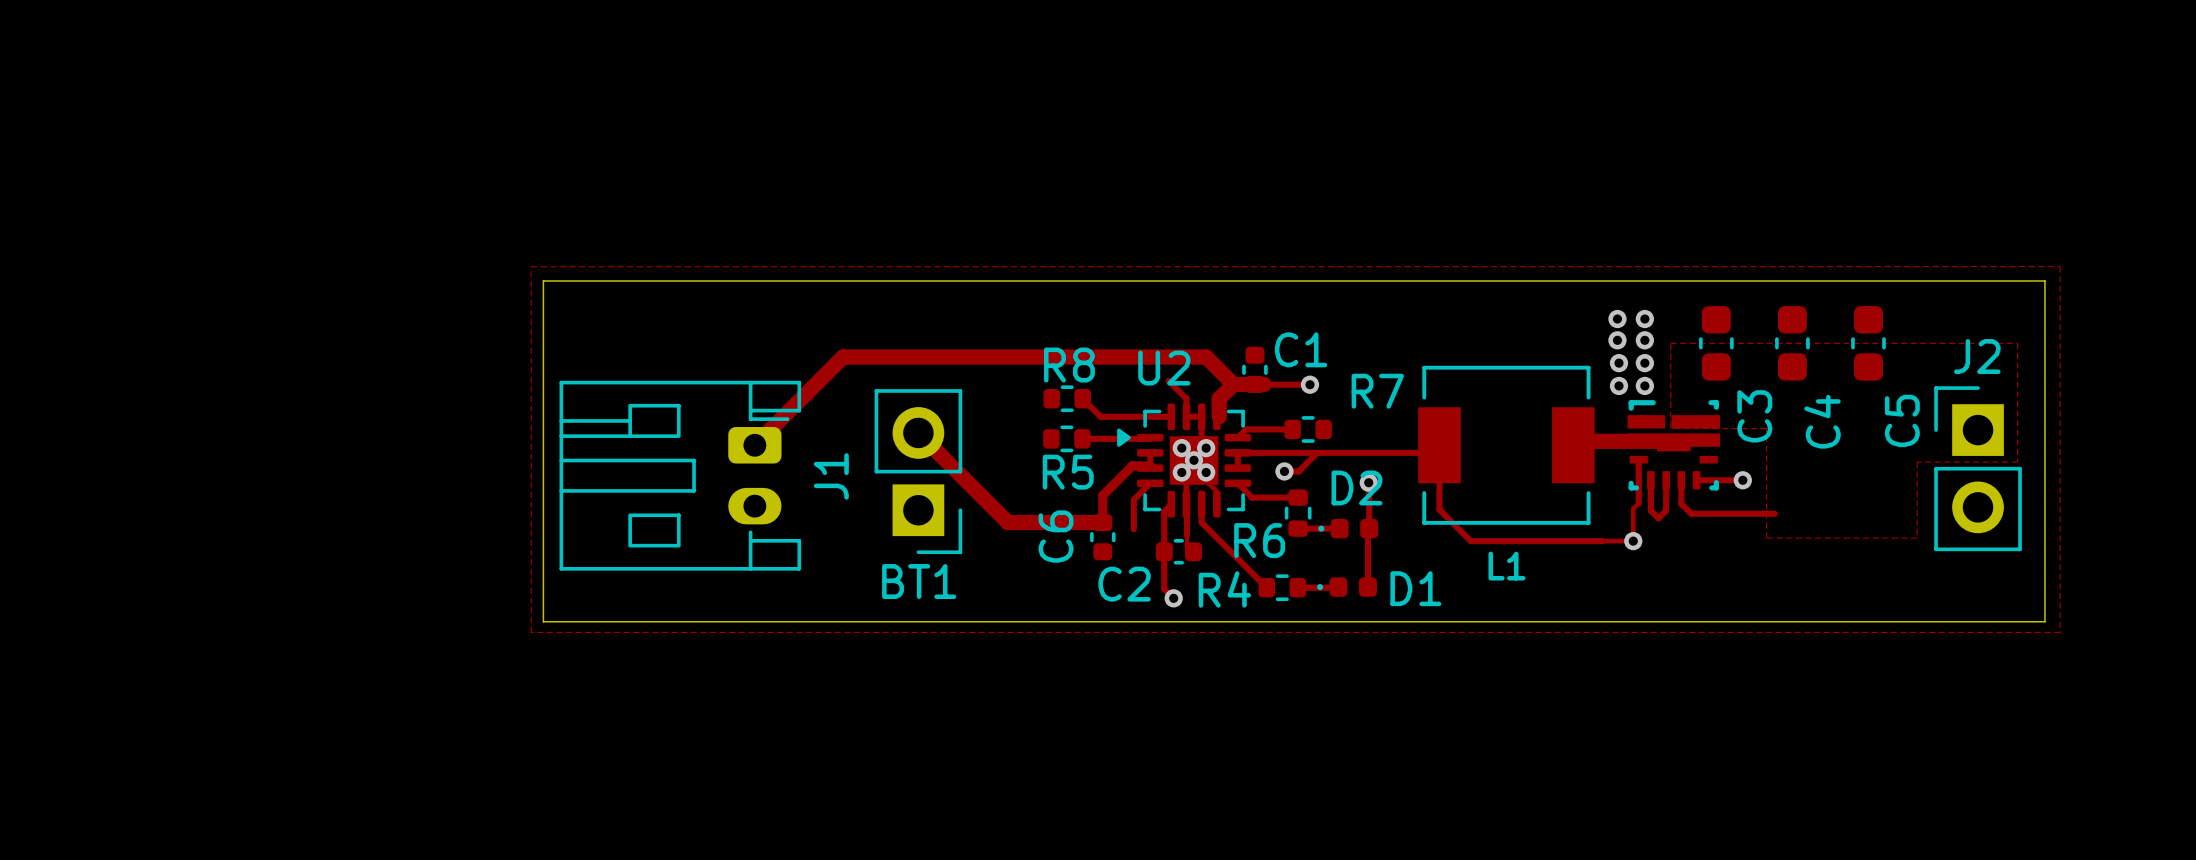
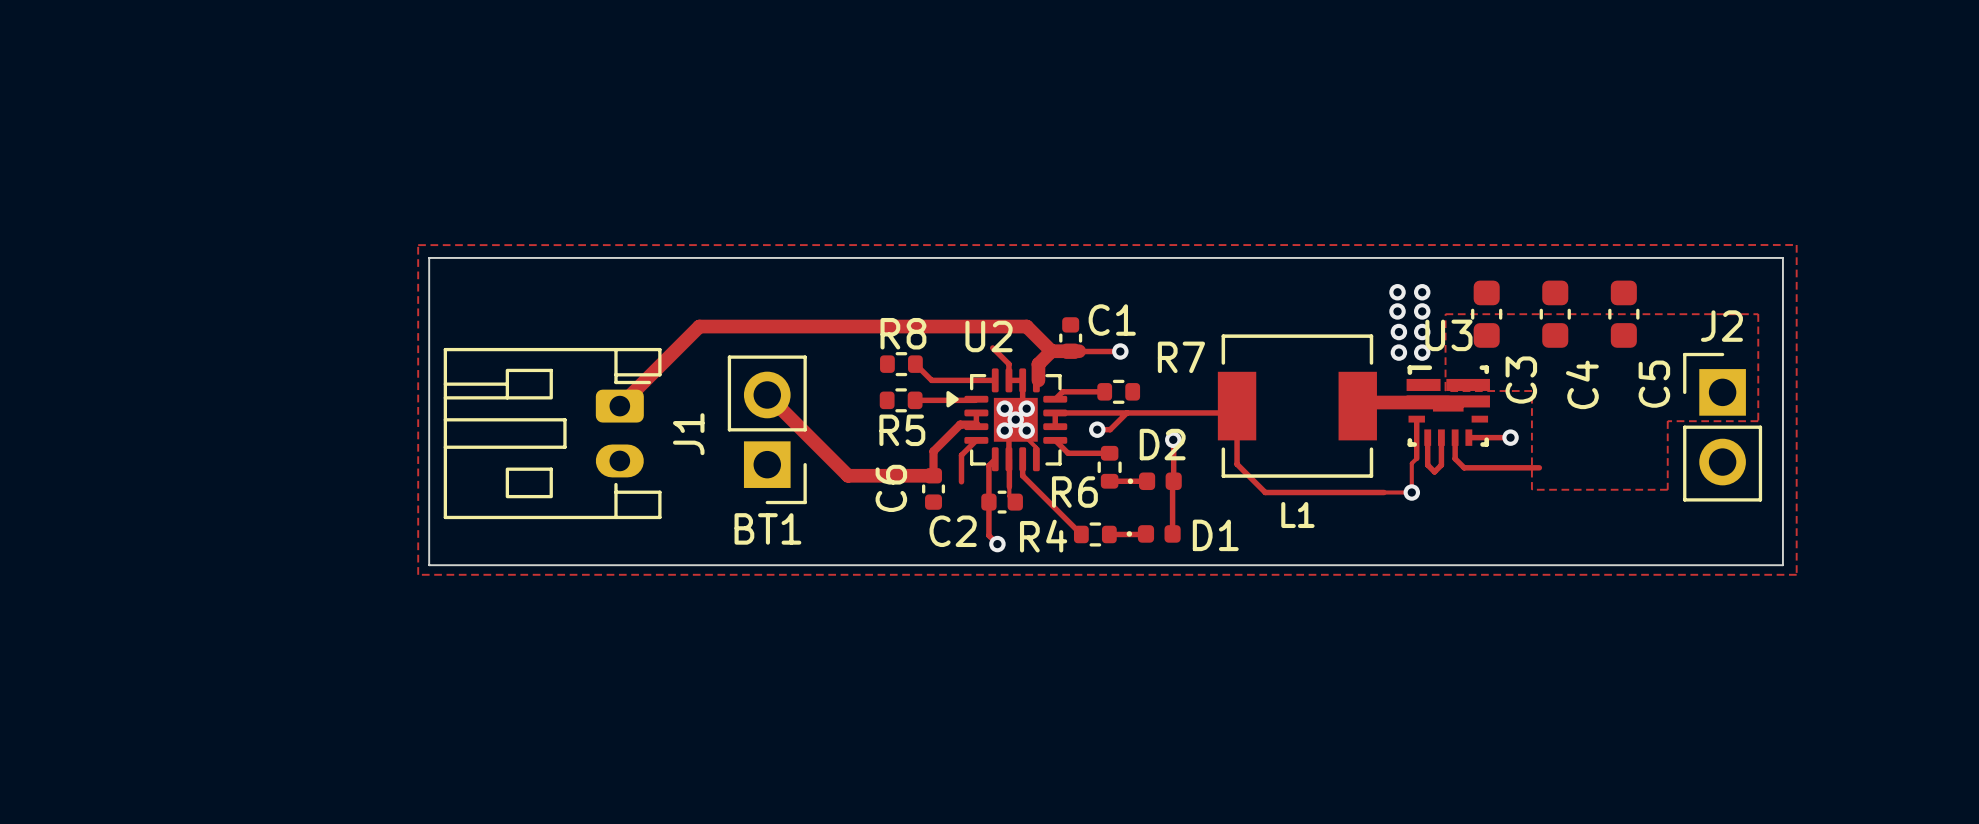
U3 name: none -> U3 (1448, 335)

